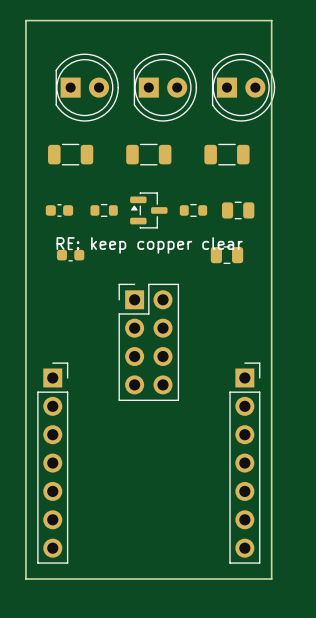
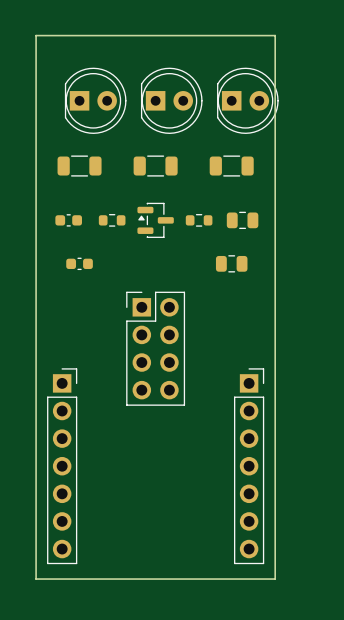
text: RF: keep copper clear (149, 245) -> none

